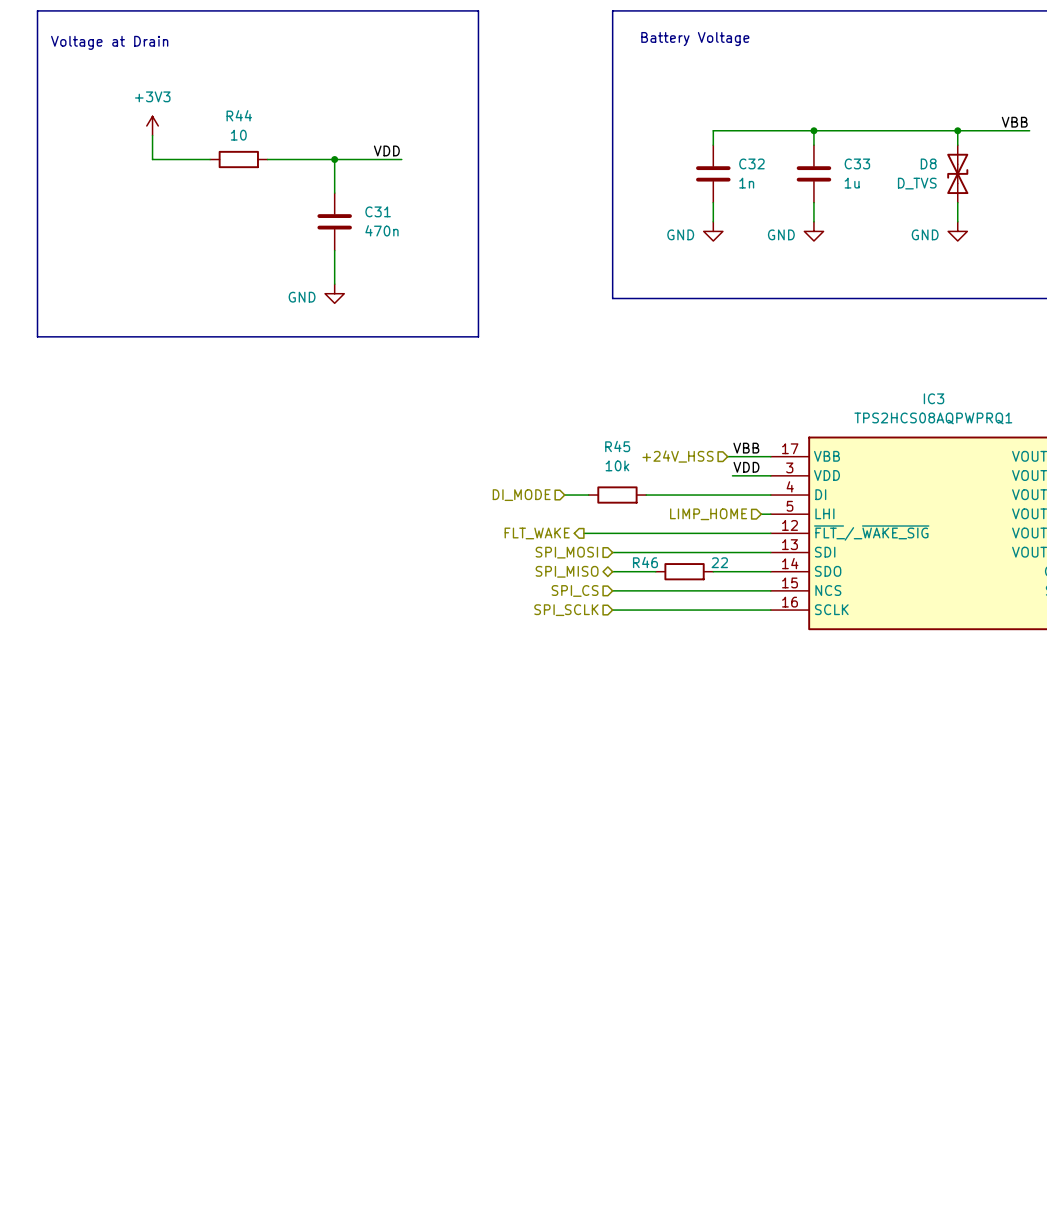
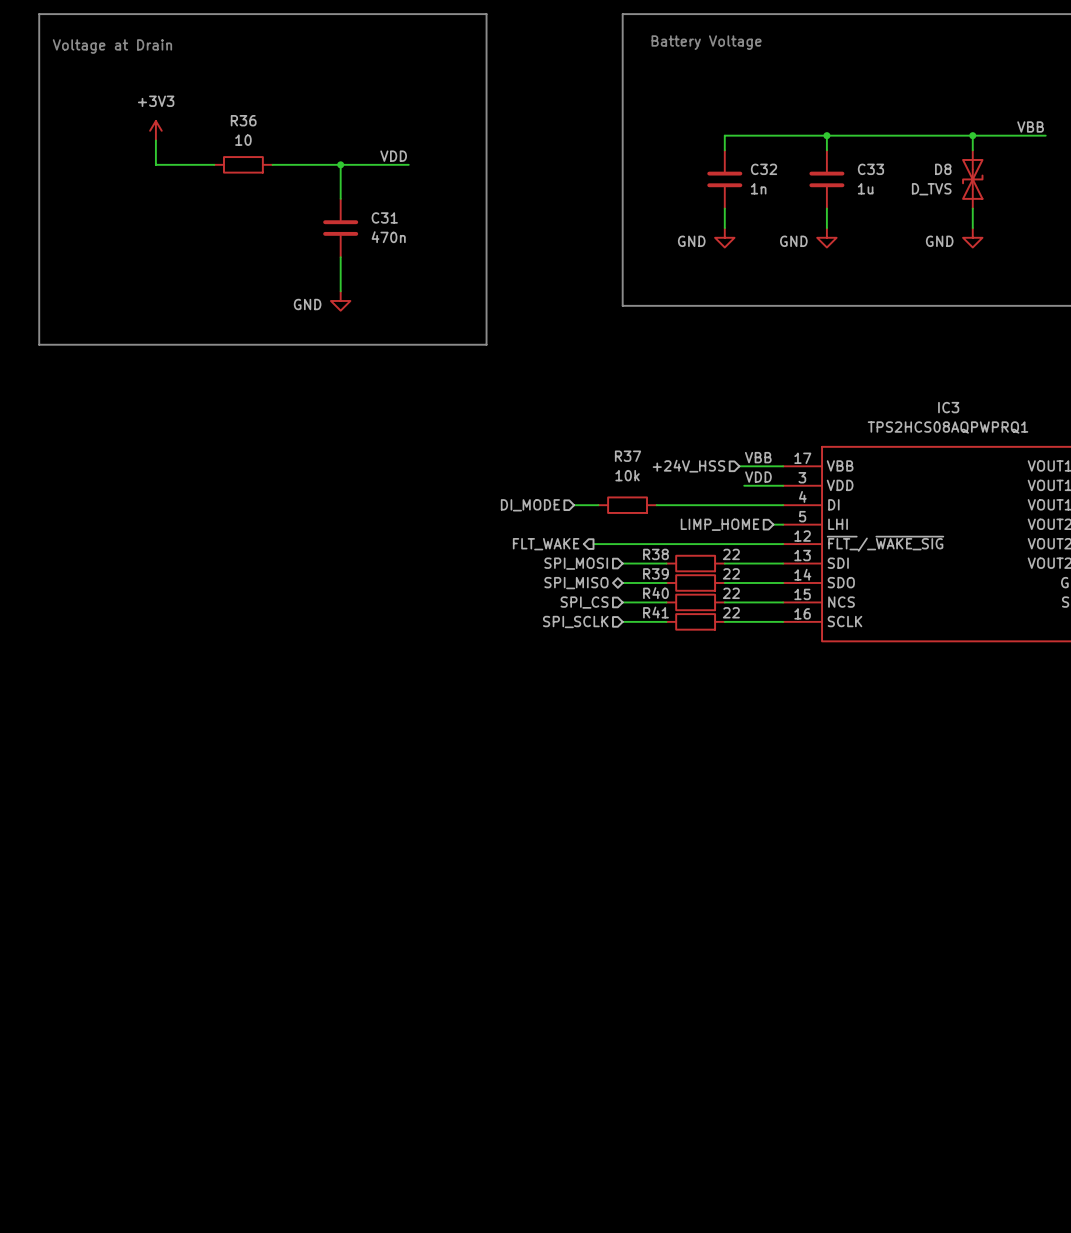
R44 name: R44 (239, 115) -> R36 (243, 120)
R45 name: R45 (617, 446) -> R37 (628, 456)
wire: (655, 552) (713, 552) -> none
R38: none -> 22 (695, 563)
R46 name: R46 (645, 562) -> R39 (655, 573)
wire: (655, 590) (713, 590) -> none
R40: none -> 22 (695, 602)
wire: (655, 610) (713, 610) -> none
R41: none -> 22 (695, 621)

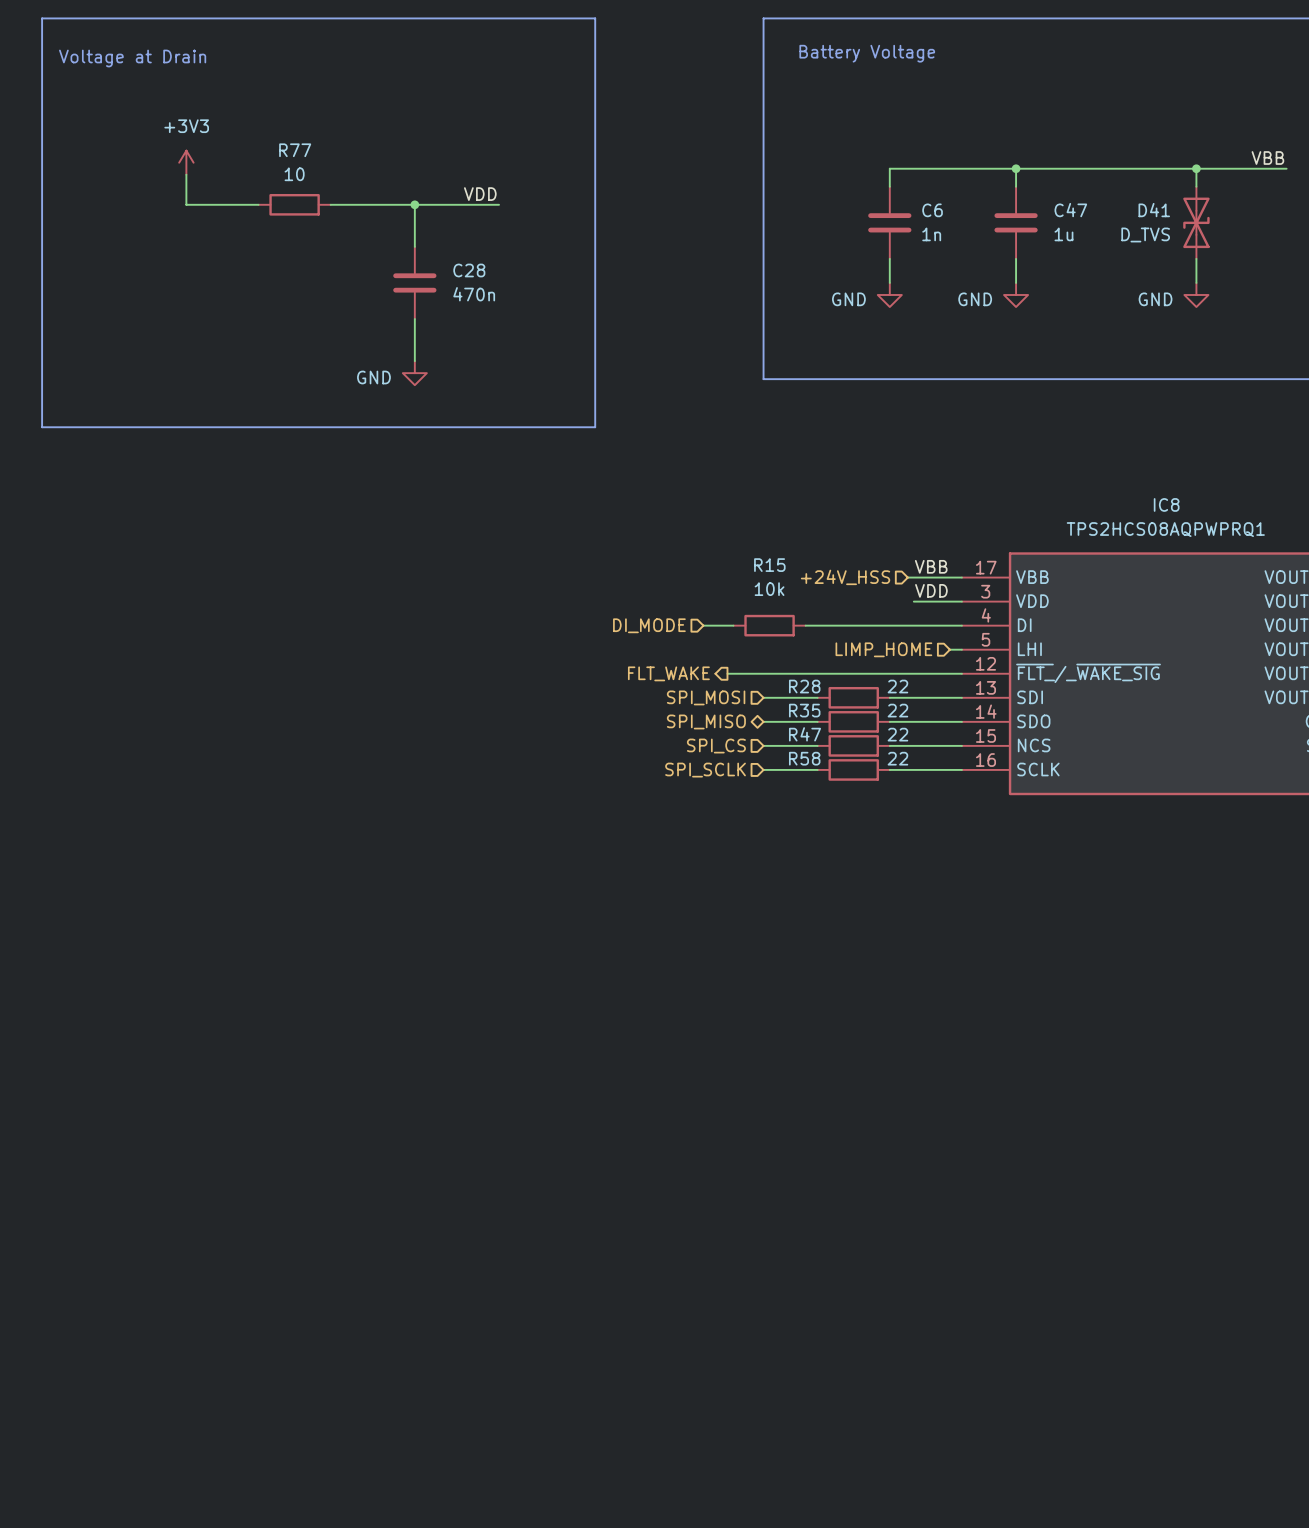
R36 name: R36 (243, 120) -> R77 (295, 150)
C32 name: C32 (764, 169) -> C6 (932, 210)
C33 name: C33 (870, 169) -> C47 (1070, 210)
D8 name: D8 (943, 169) -> D41 (1154, 210)
C31 name: C31 (384, 217) -> C28 (469, 270)
IC3 name: IC3 (948, 407) -> IC8 (1166, 504)
R37 name: R37 (628, 456) -> R15 (769, 565)
R38 name: R38 (655, 554) -> R28 (804, 686)
R39 name: R39 (655, 573) -> R35 (804, 710)
R40 name: R40 (655, 593) -> R47 (805, 734)
R41 name: R41 (655, 612) -> R58 (804, 758)

